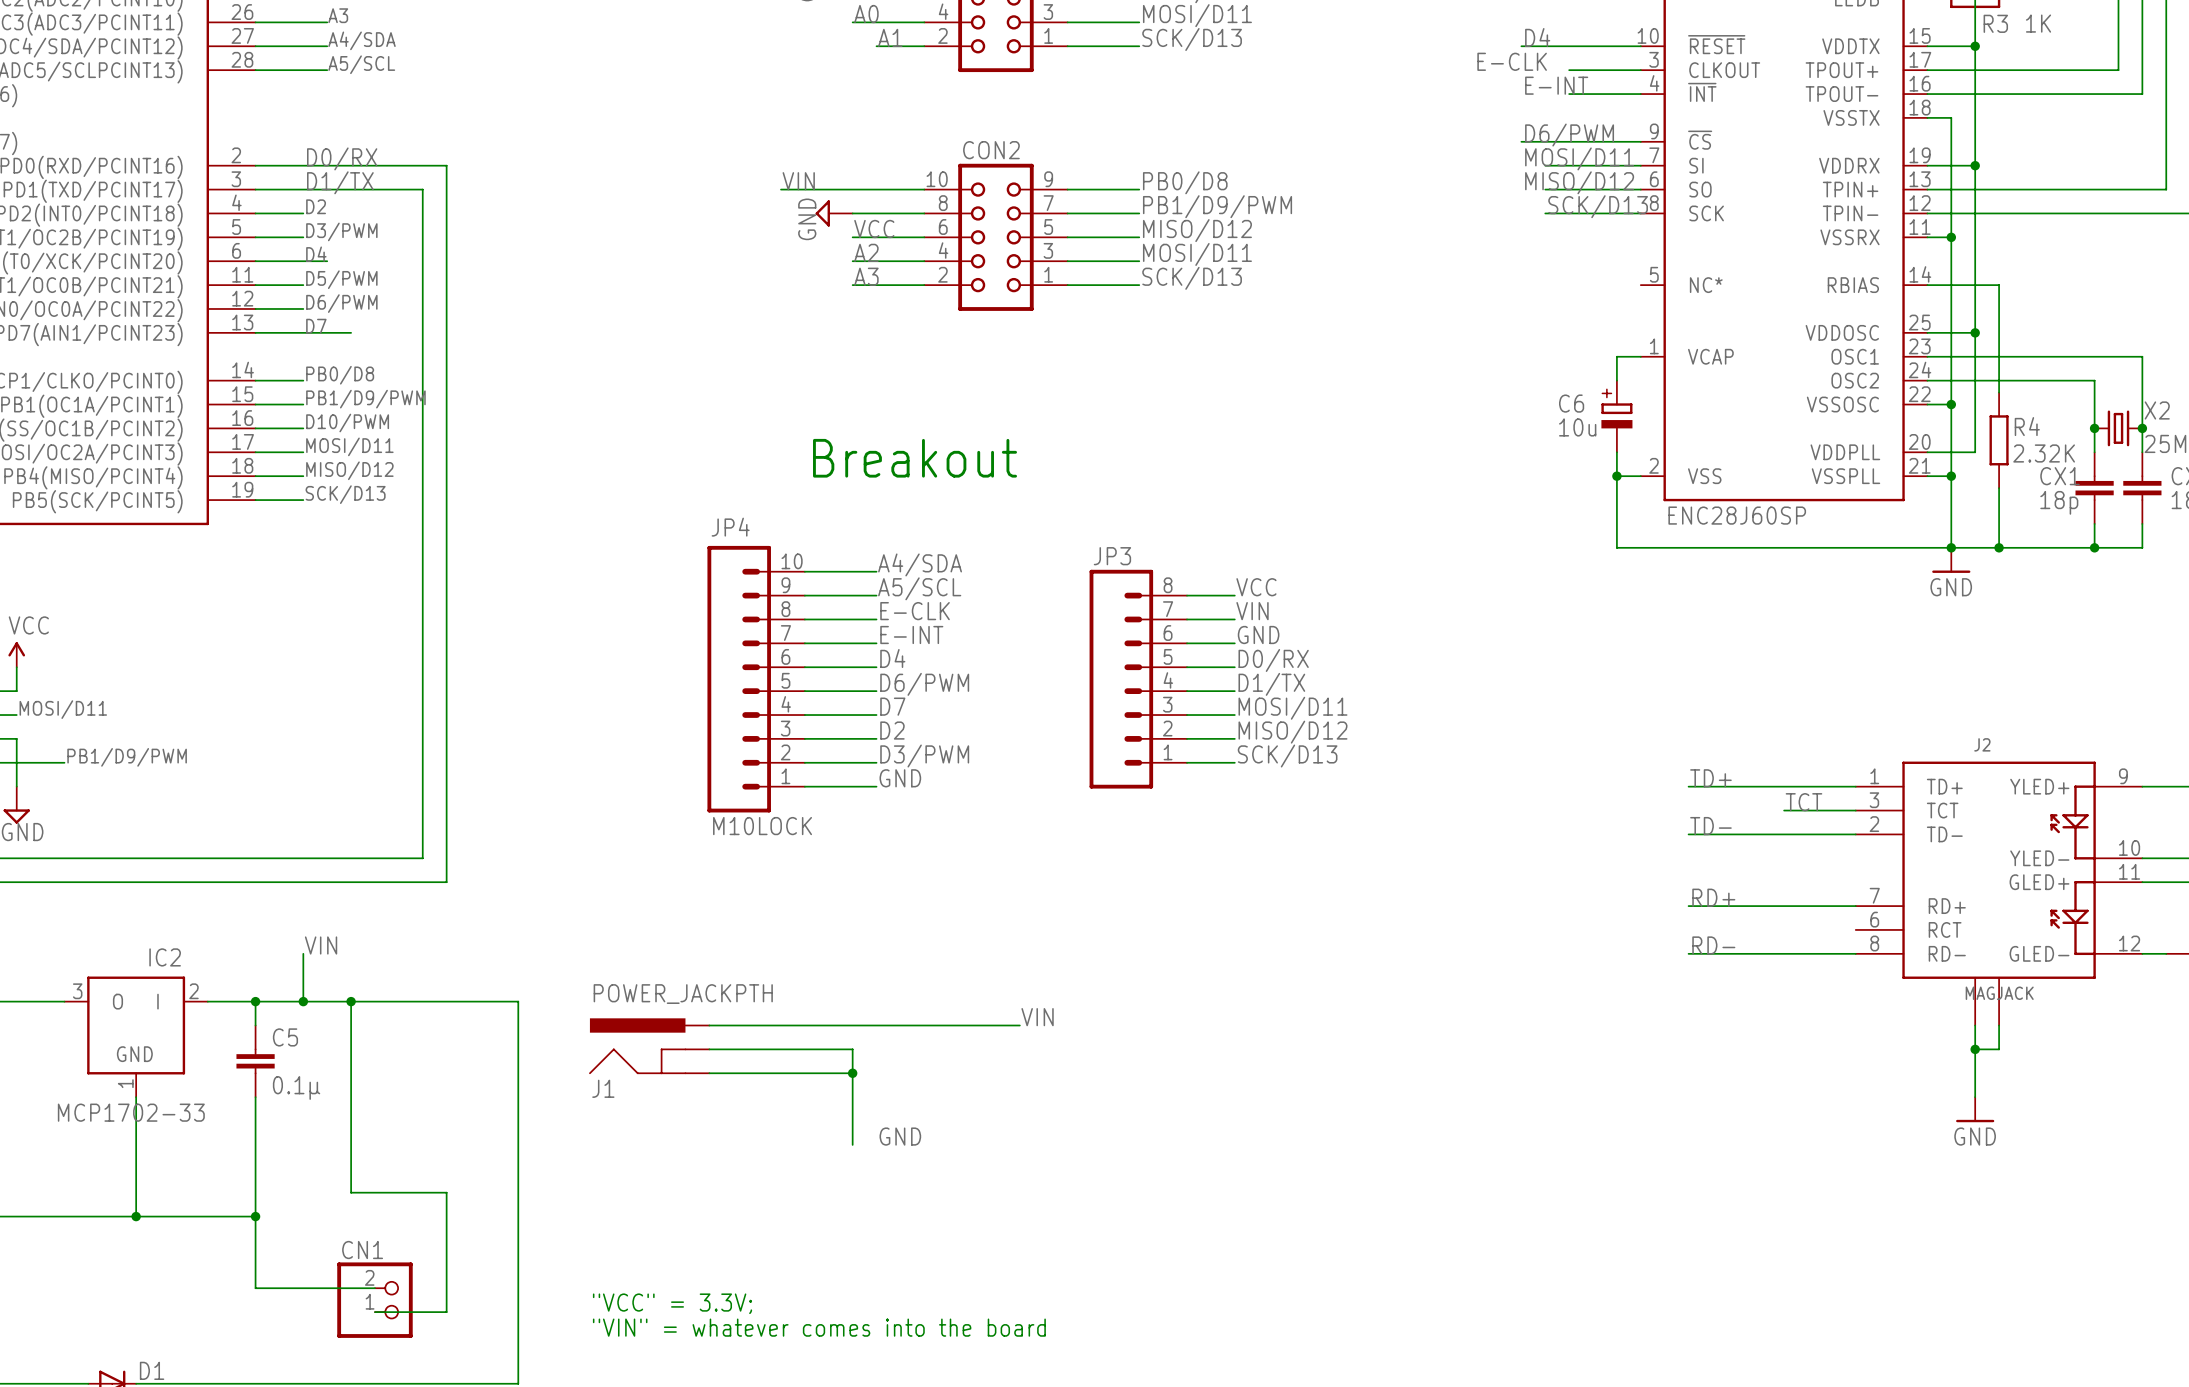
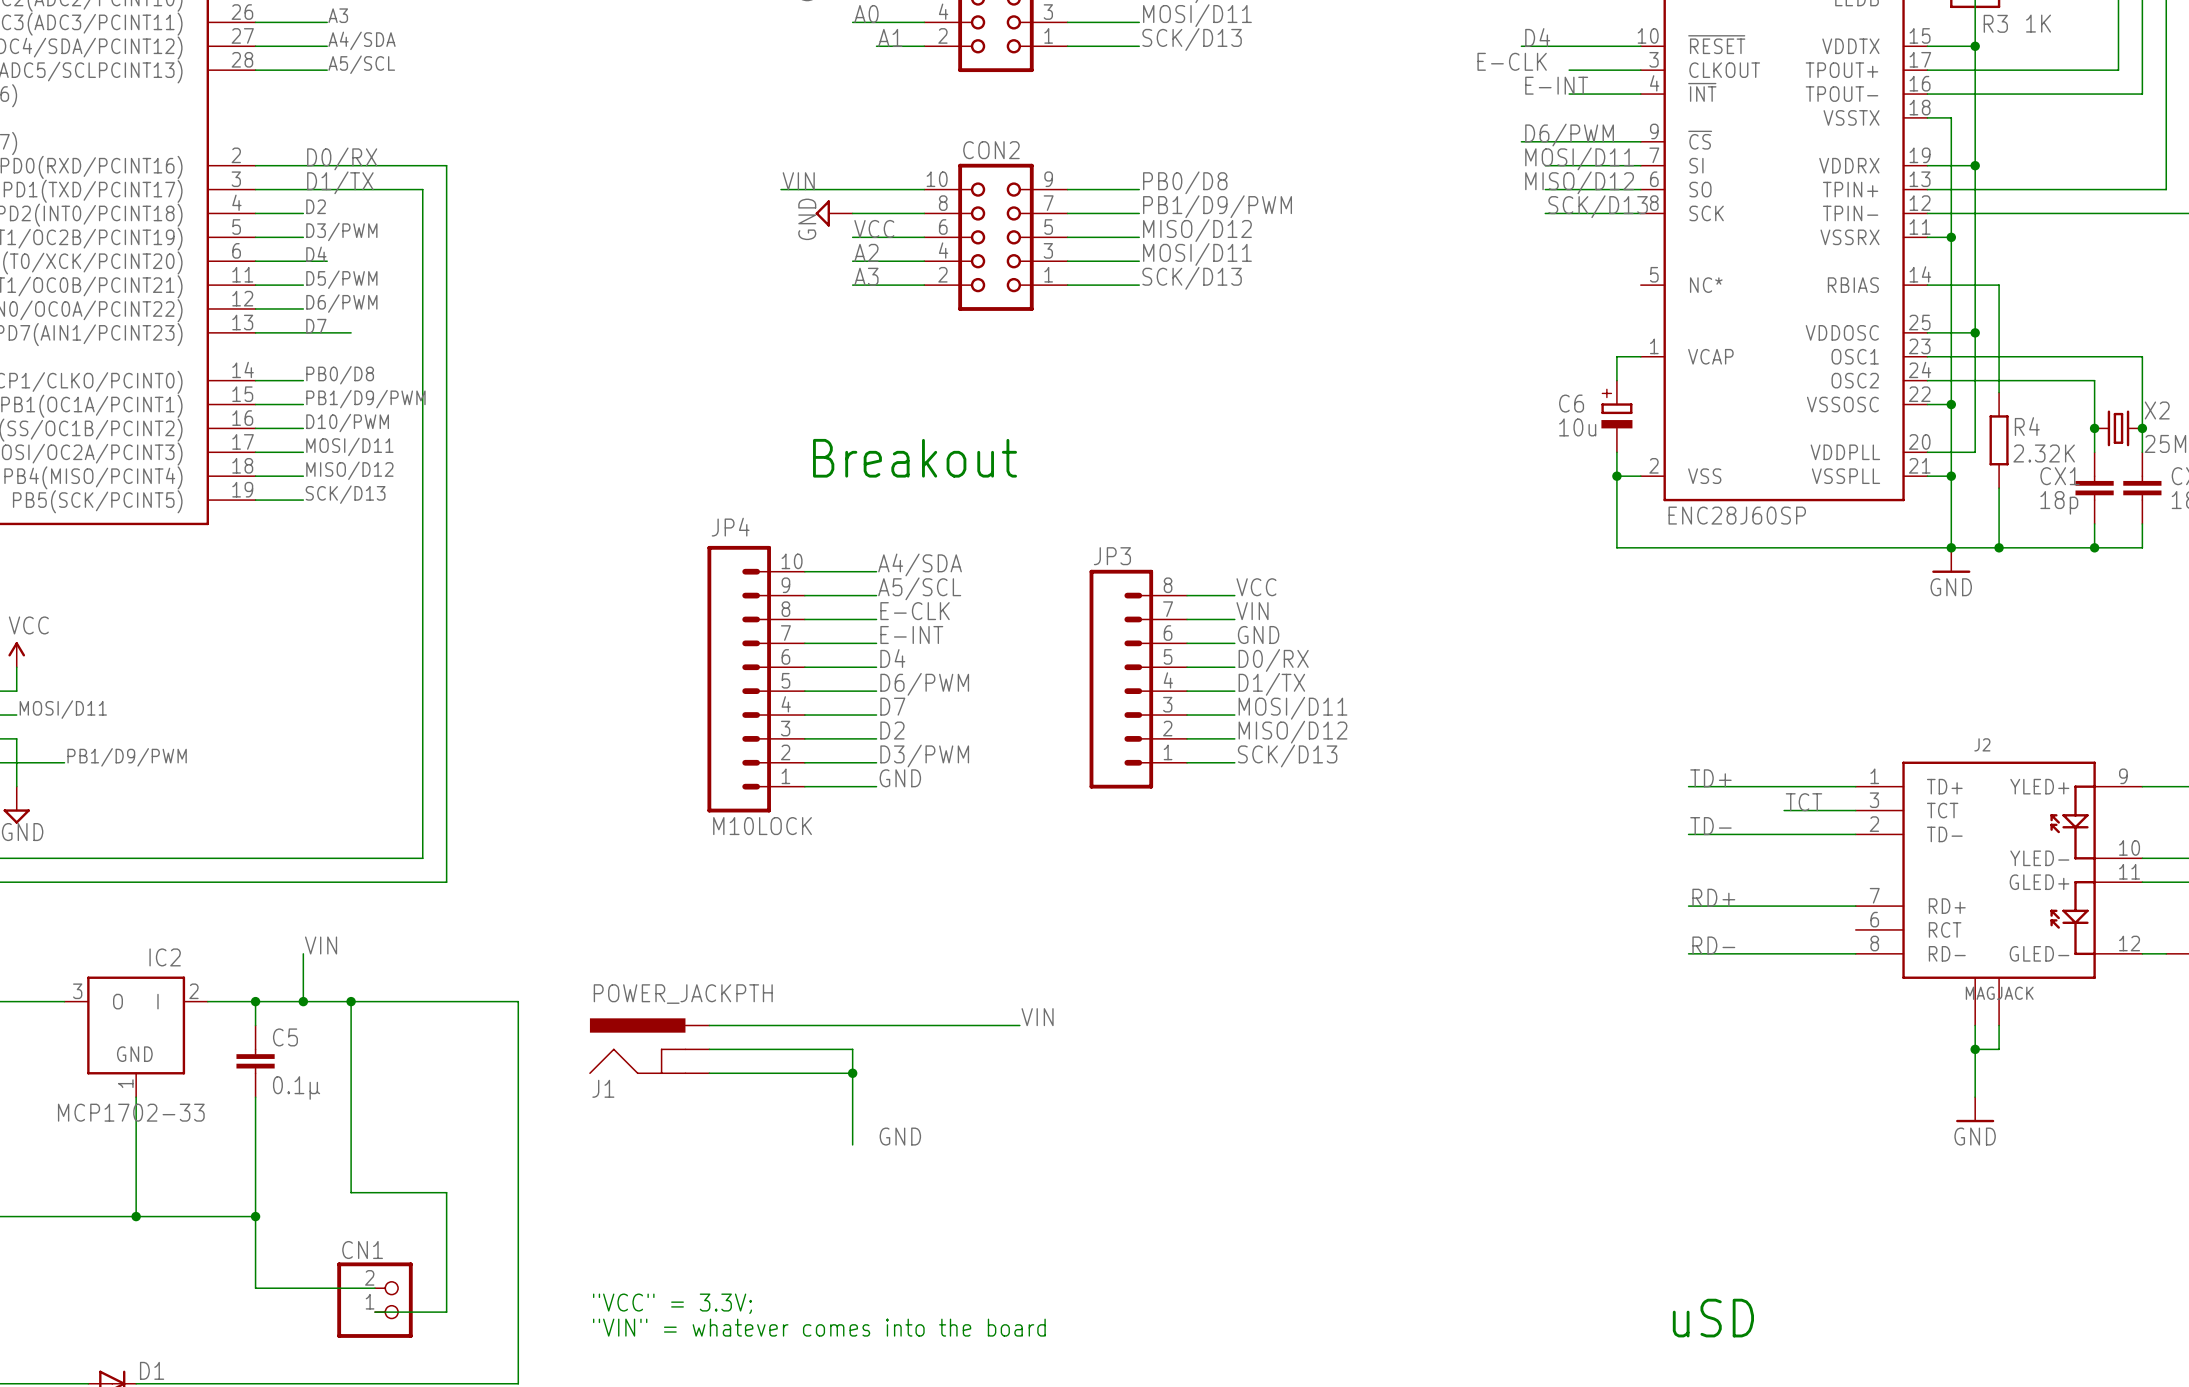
text: none -> uSD (1713, 1318)

